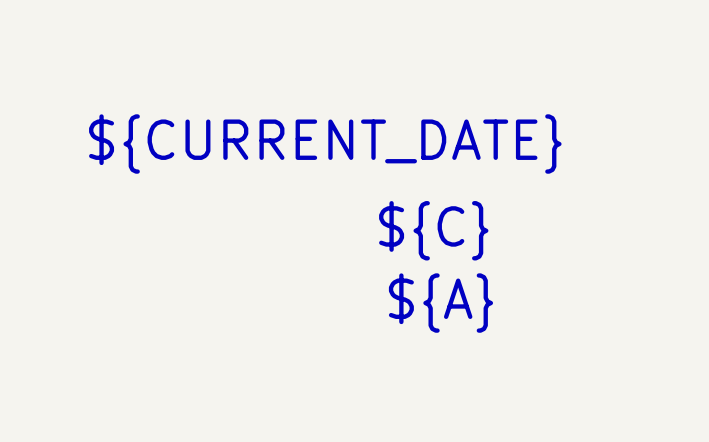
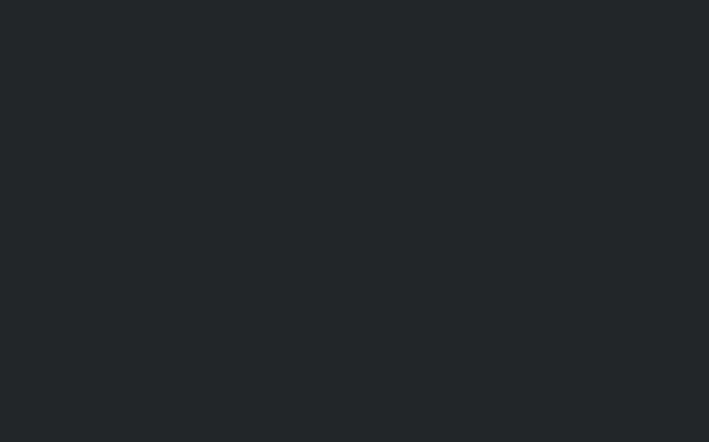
text: ${CURRENT_DATE} (325, 144) -> none
text: ${C} (433, 230) -> none
text: ${A} (440, 303) -> none

